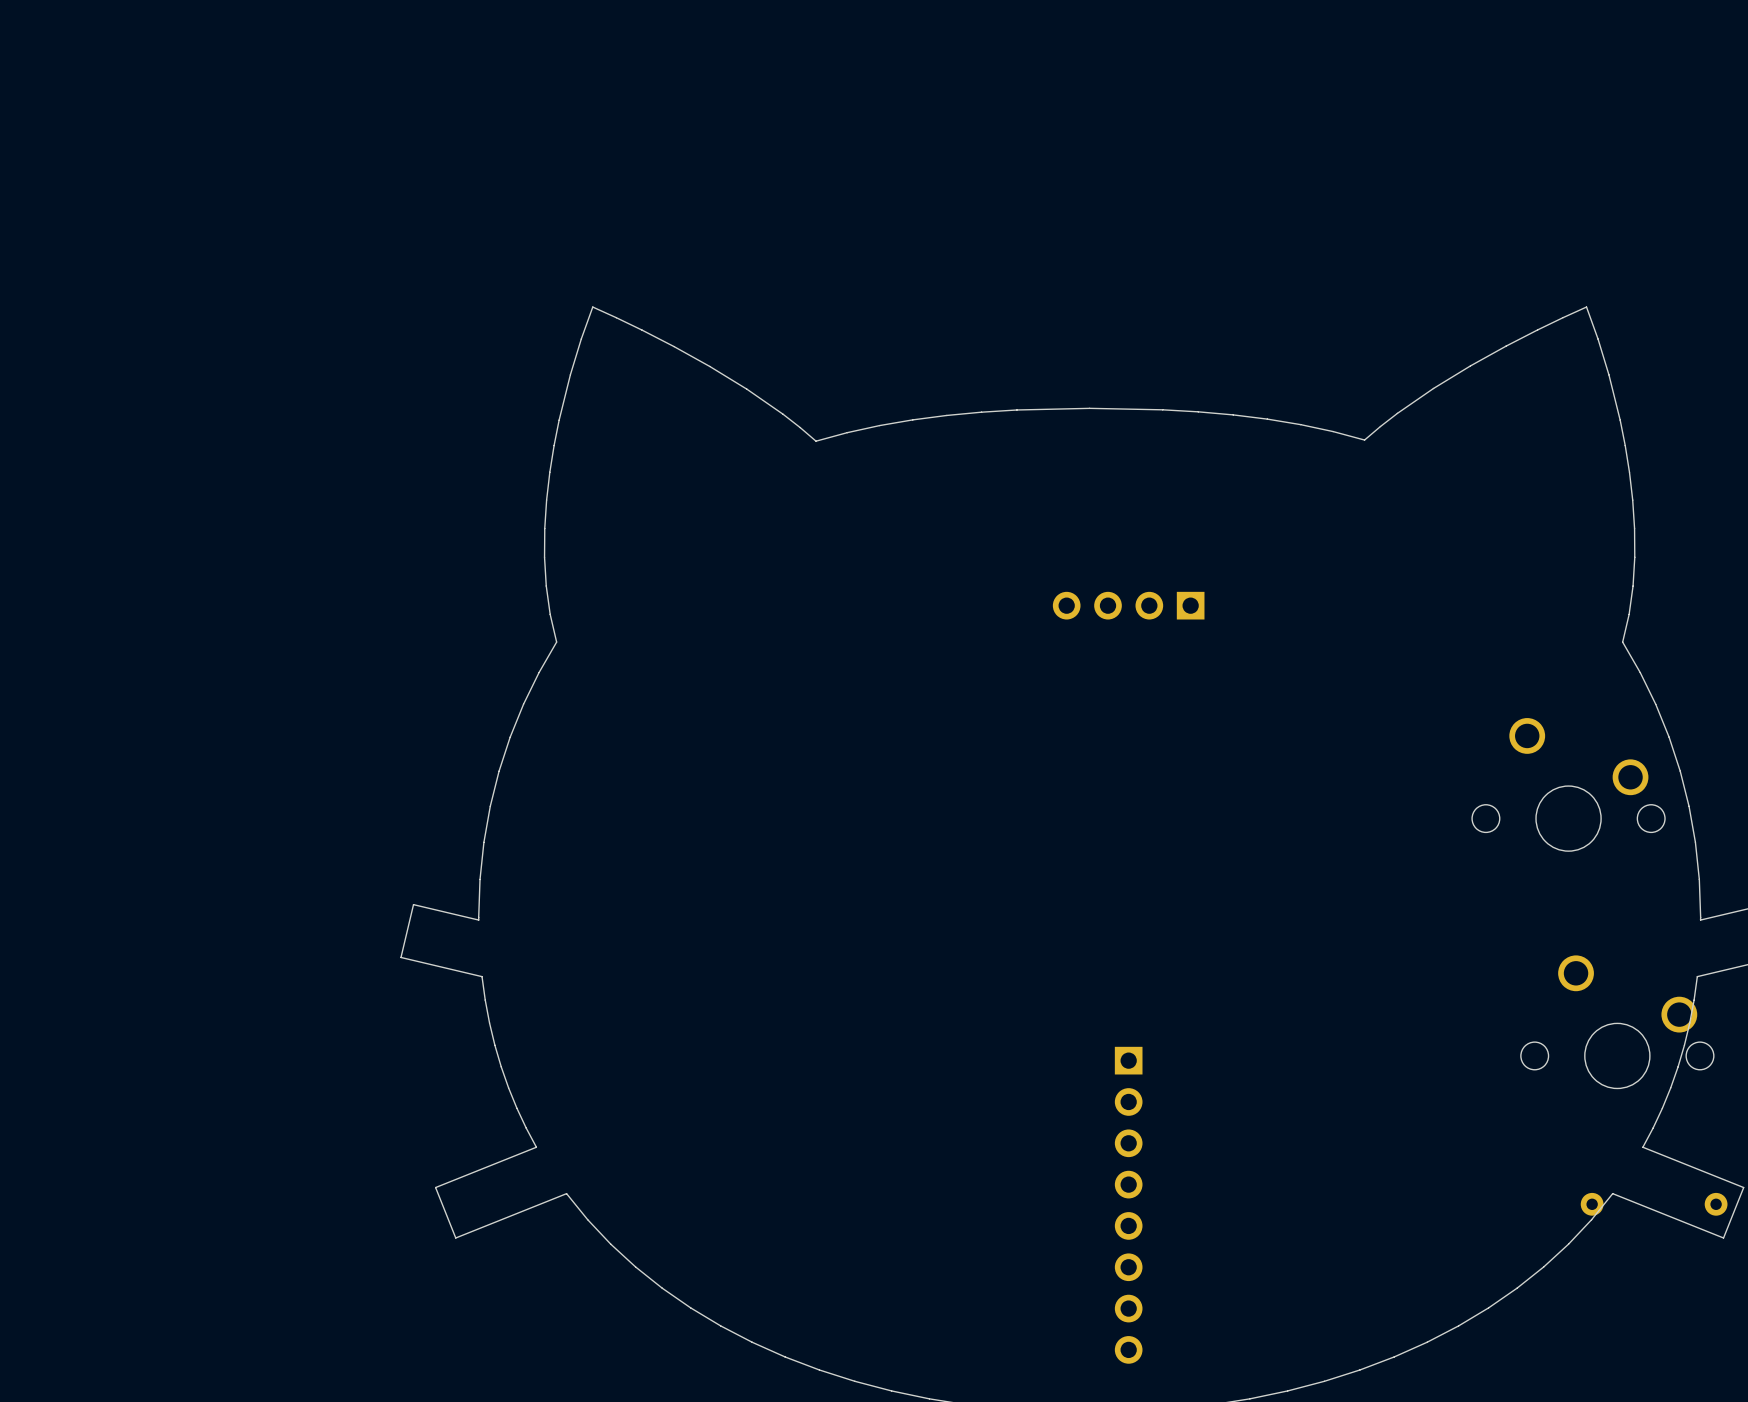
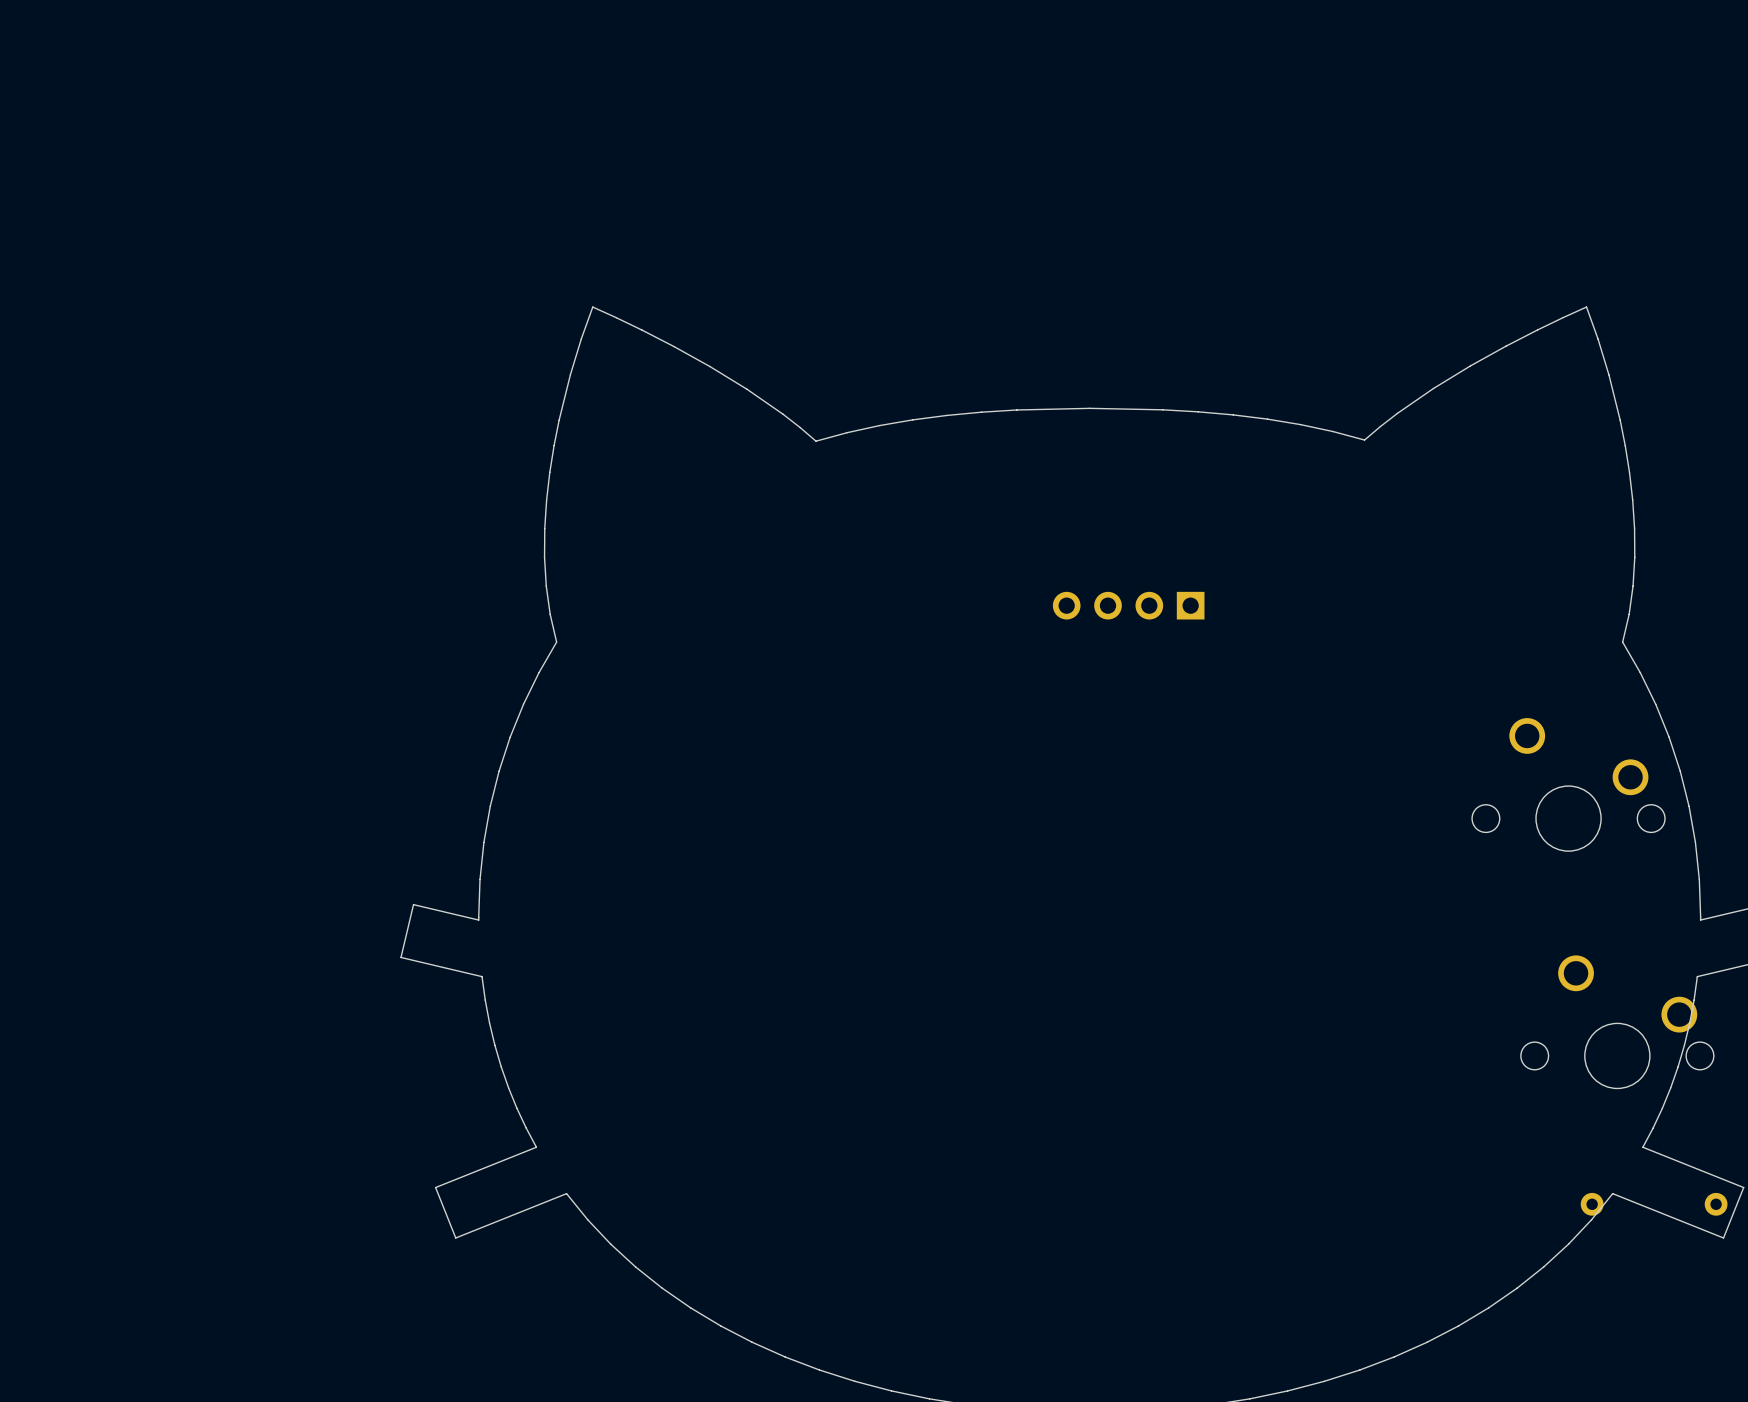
part: (1128, 1205) -> none

